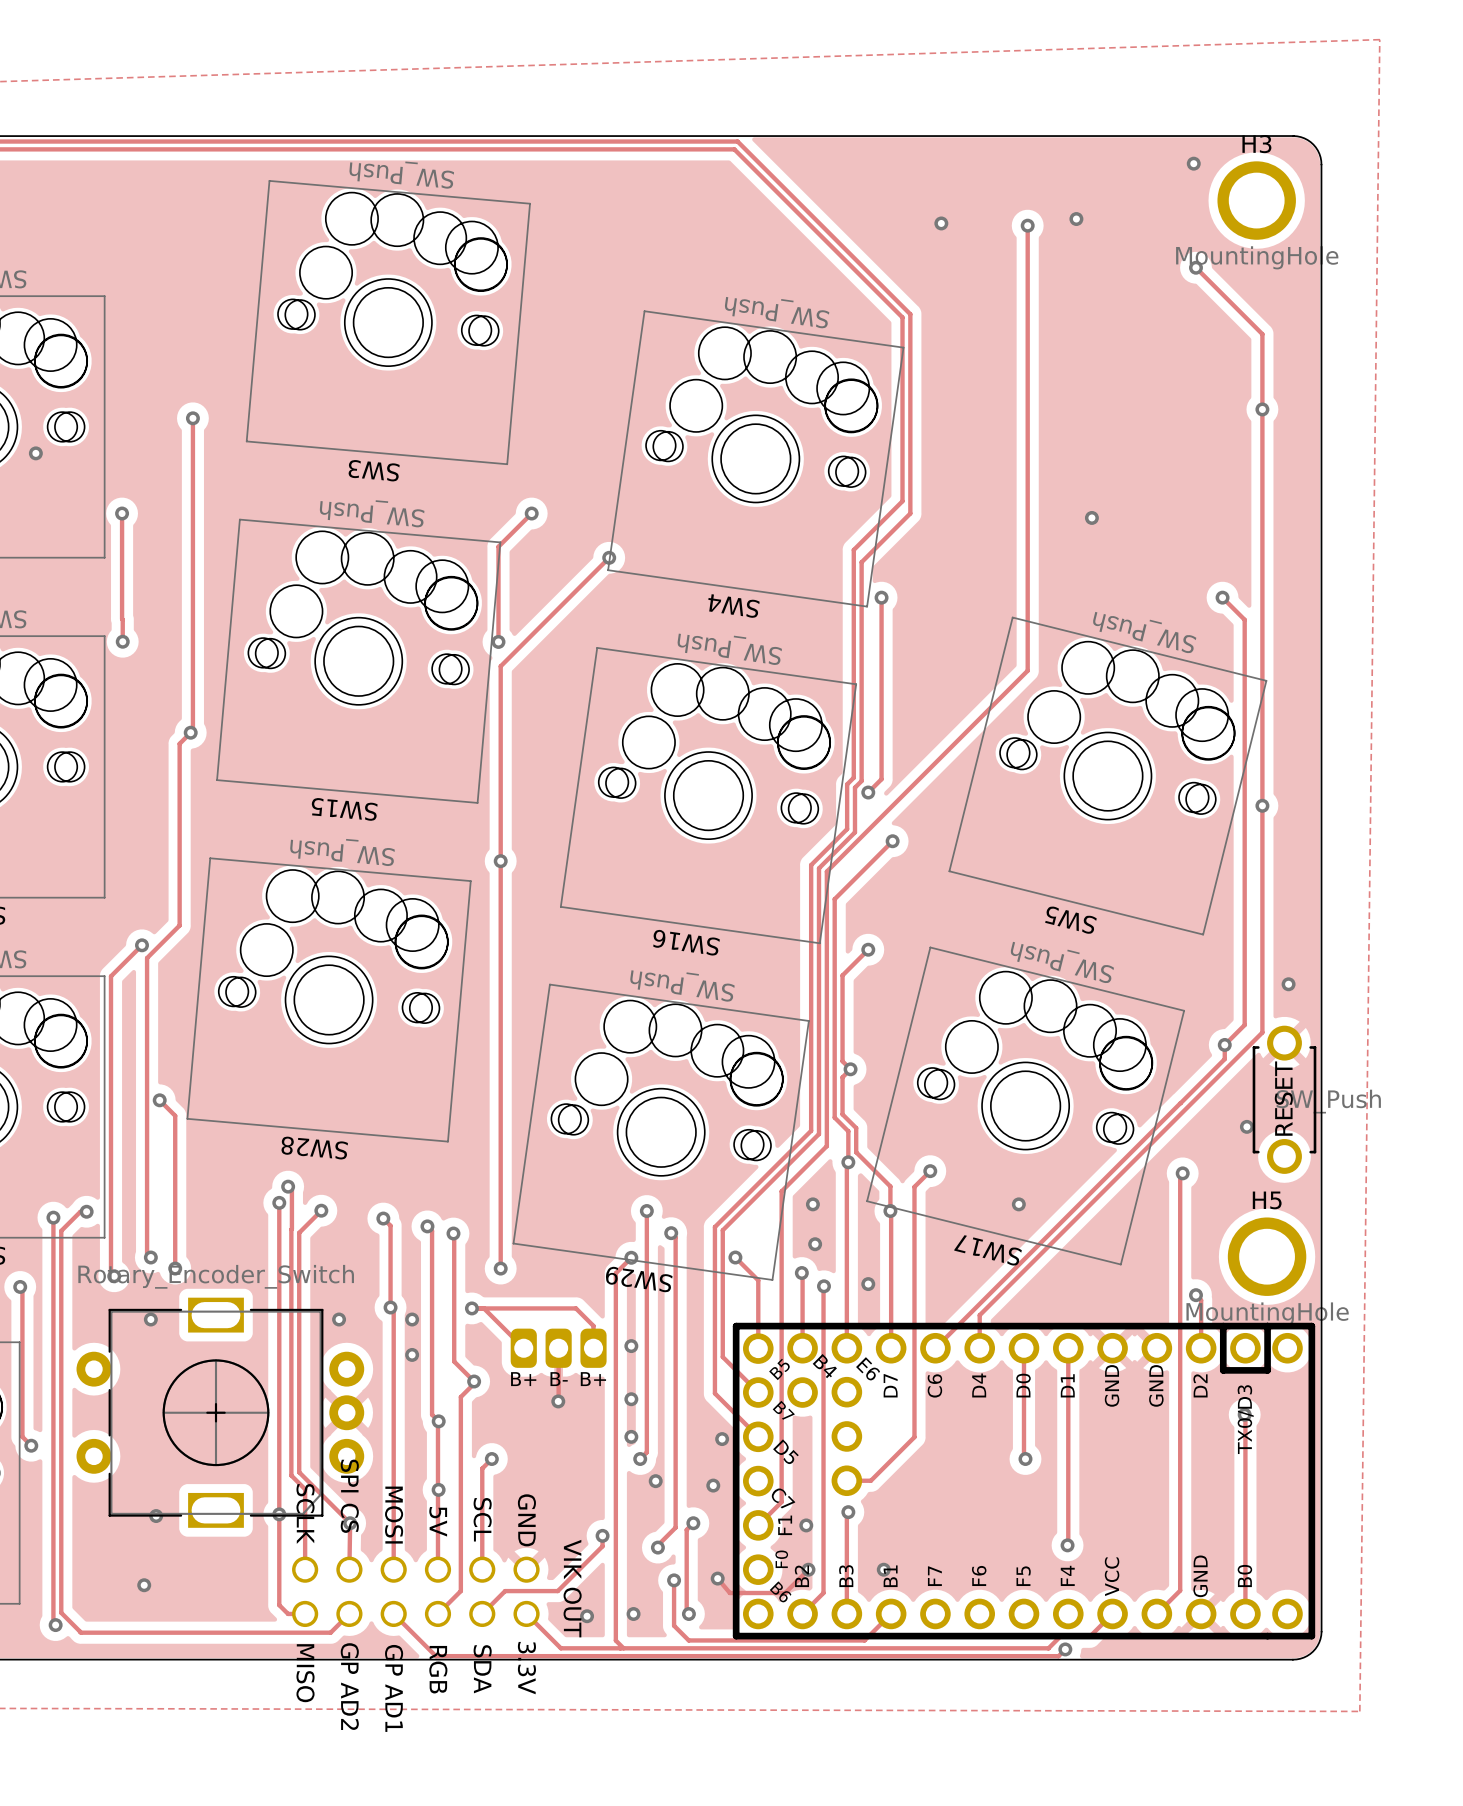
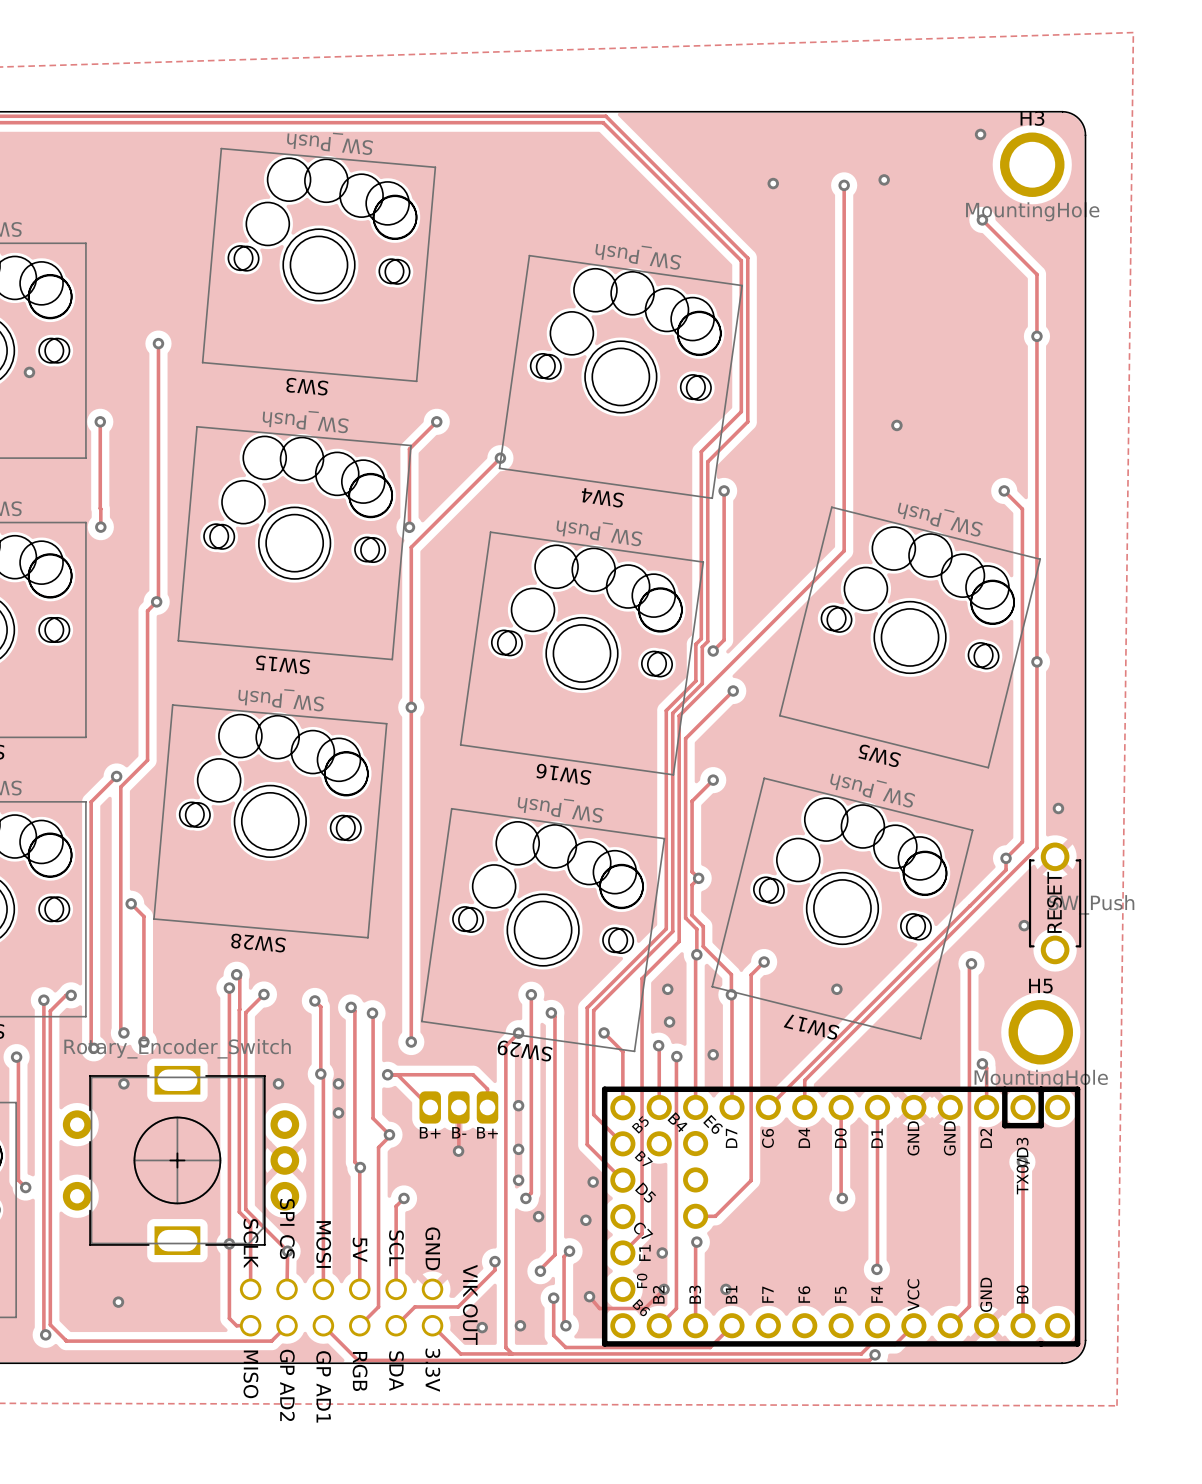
via: (438, 1489) -> none
via: (156, 1516) -> none

